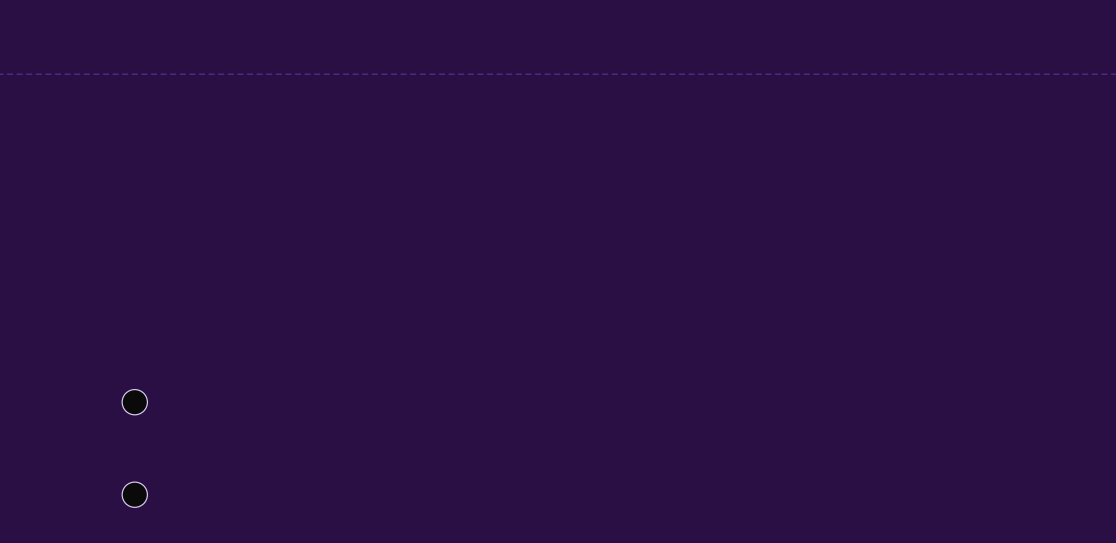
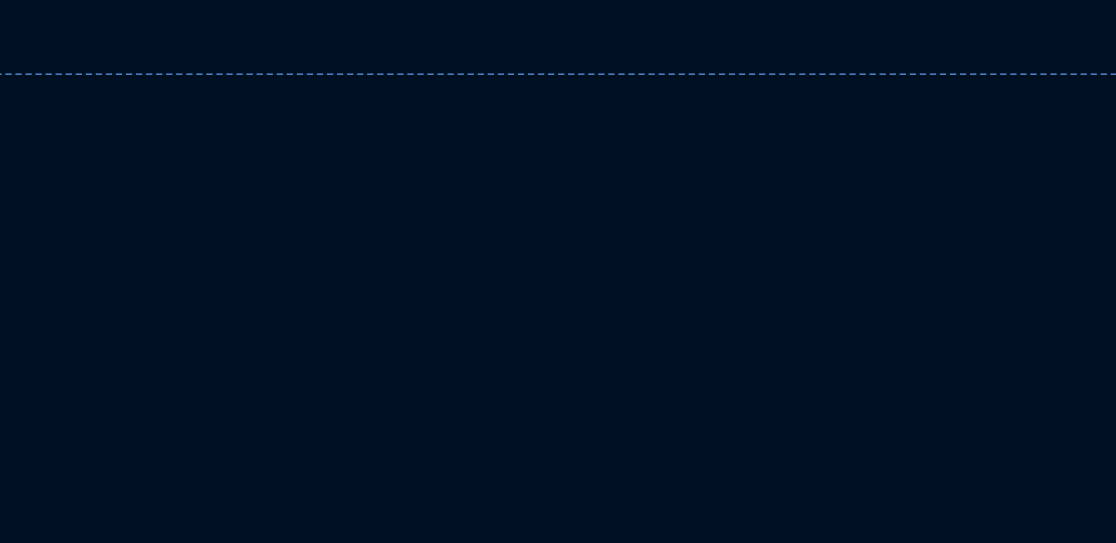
part: (134, 448) -> none

